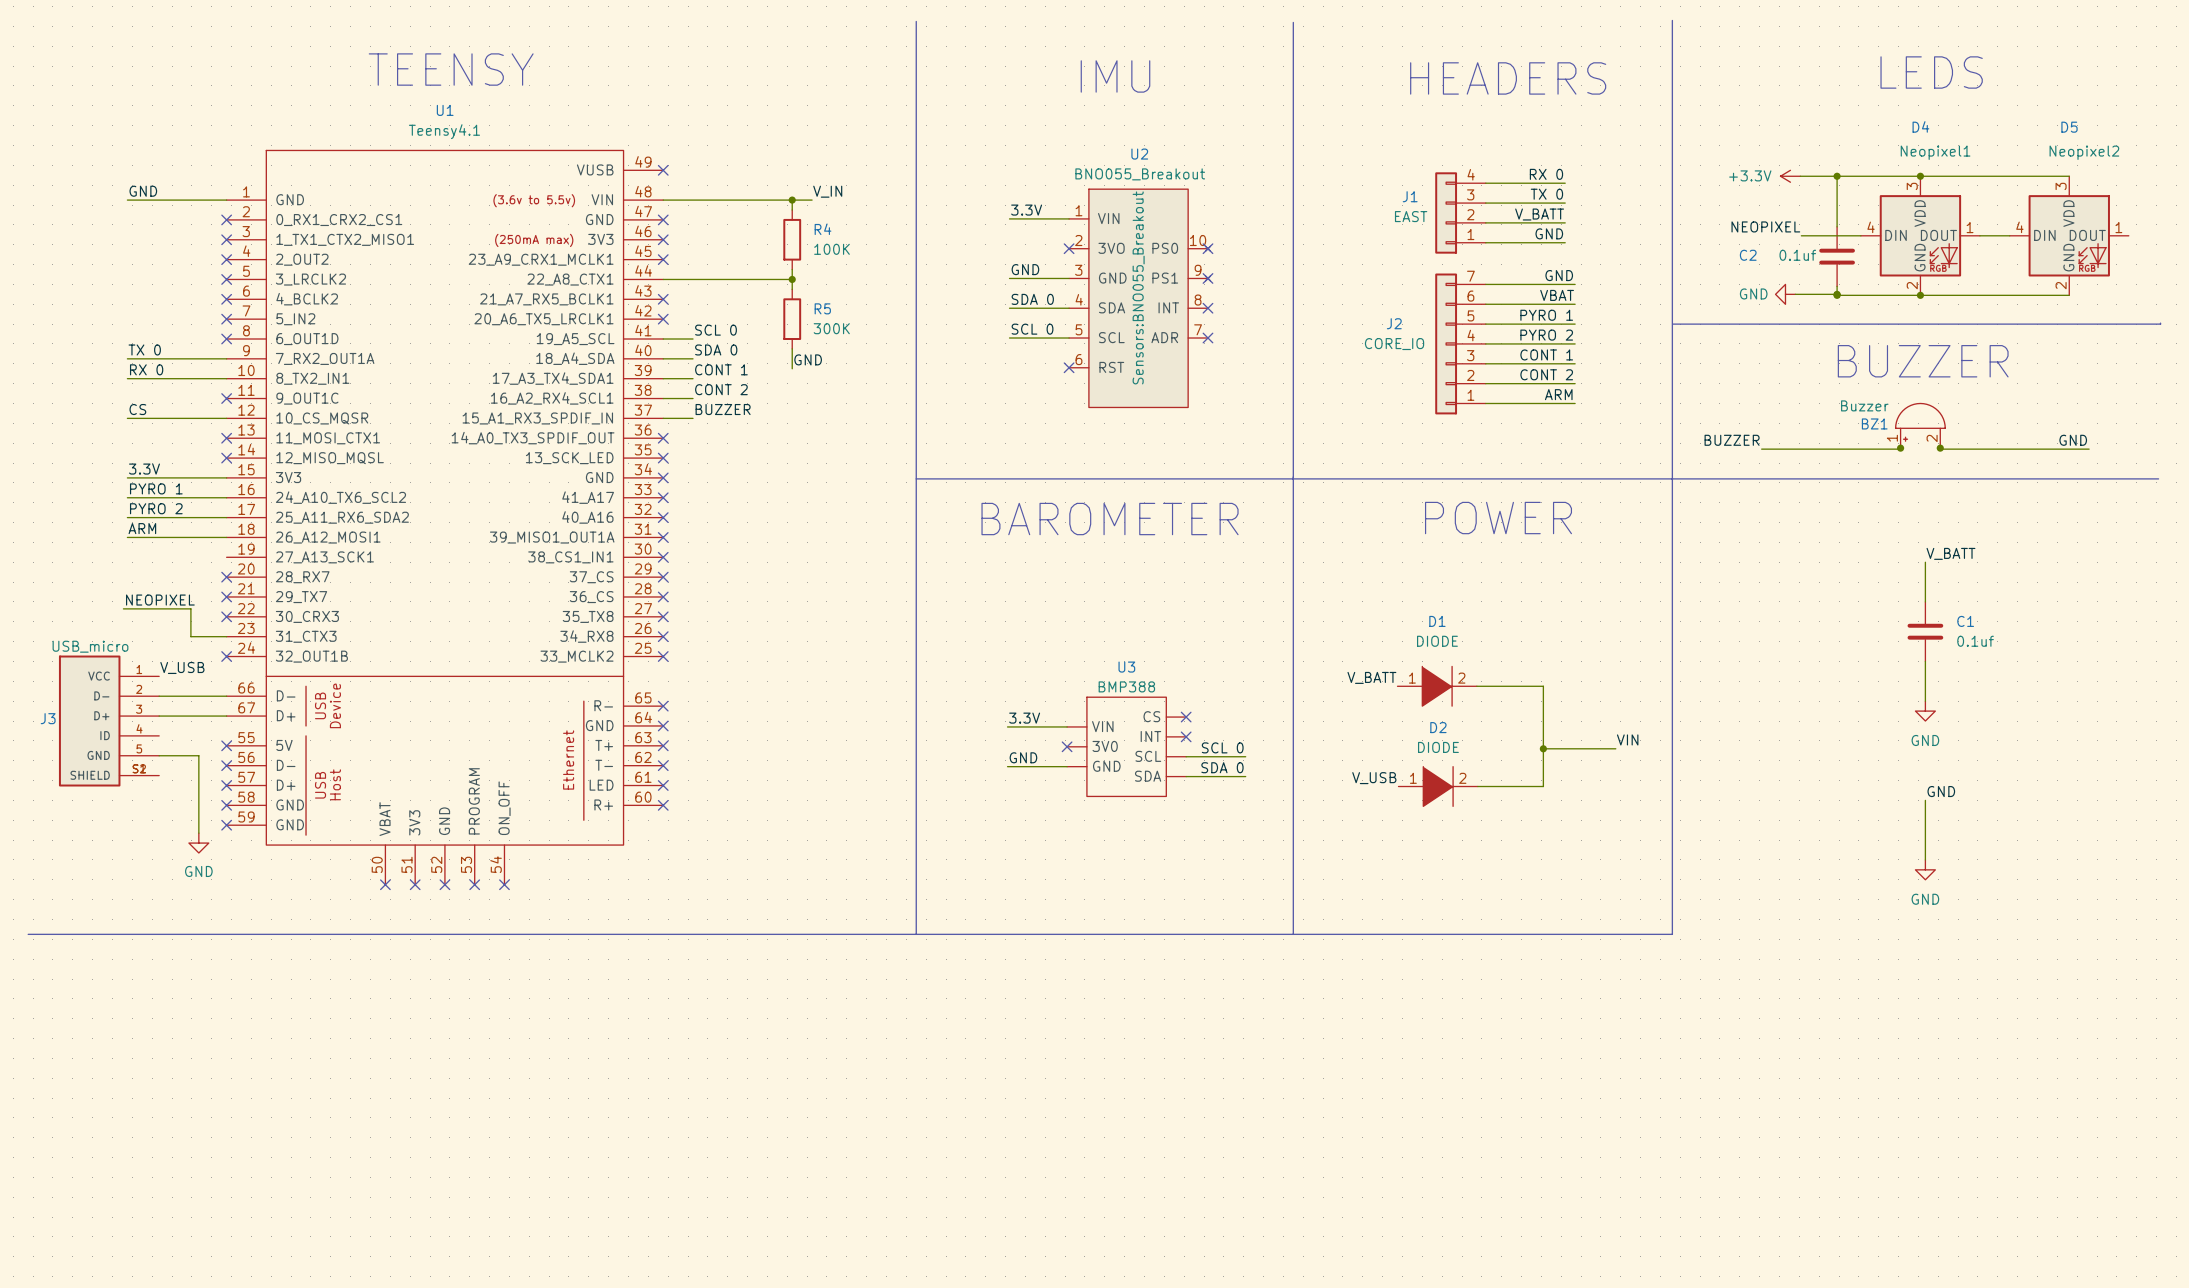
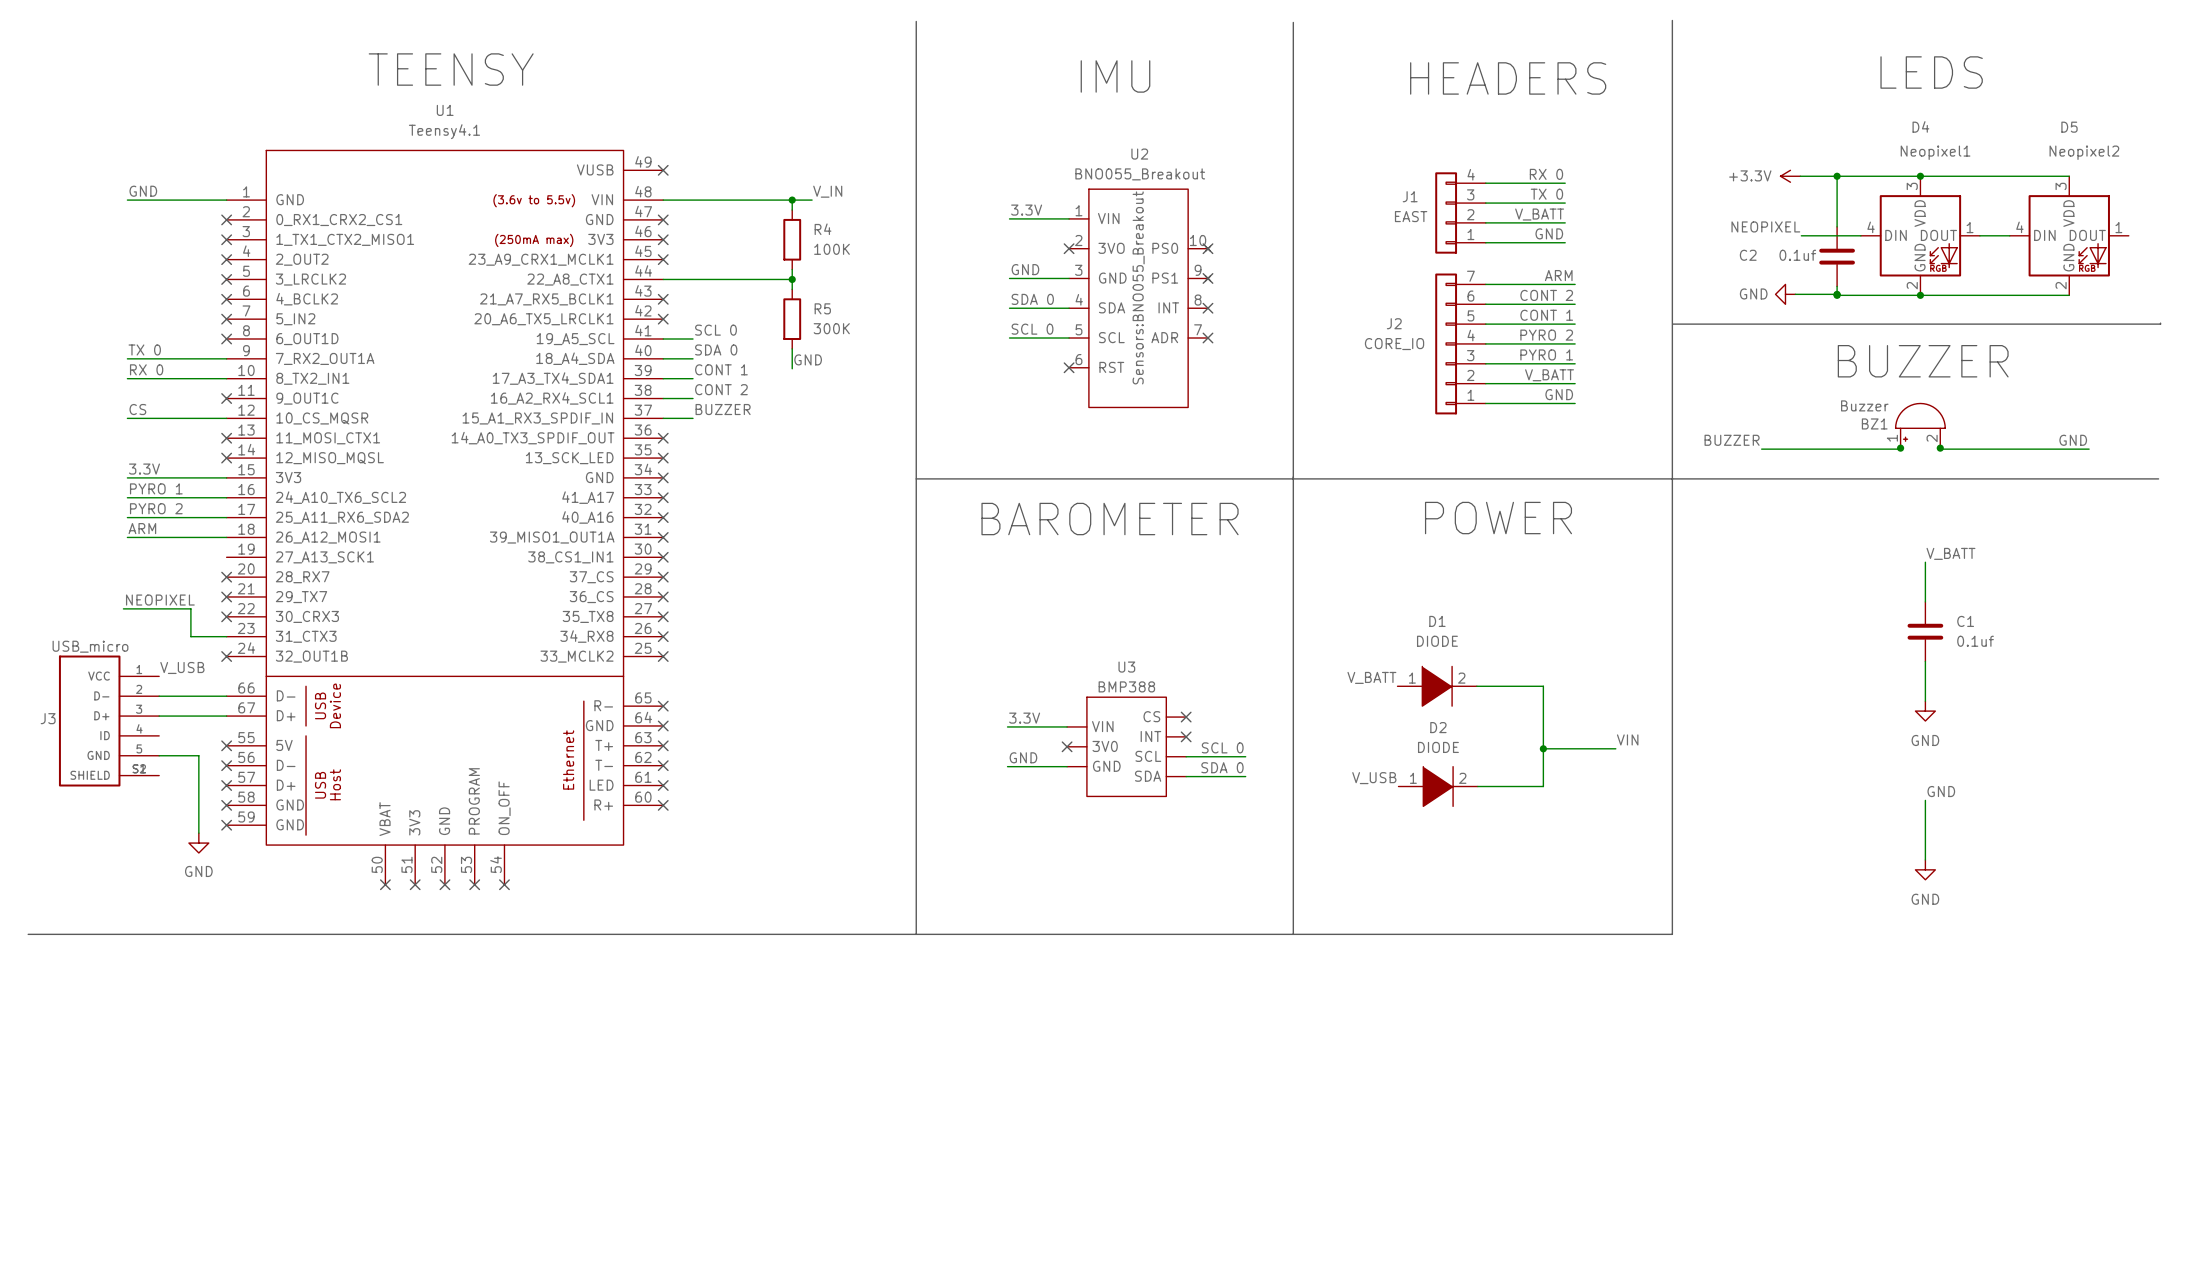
label: GND (1559, 275) -> ARM (1558, 275)
label: VBAT (1557, 295) -> CONT 2 (1546, 295)
label: PYRO 1 (1546, 315) -> CONT 1 (1546, 315)
label: CONT 1 (1546, 354) -> PYRO 1 (1546, 354)
label: CONT 2 (1546, 374) -> V_BATT (1549, 375)
label: ARM (1558, 394) -> GND (1559, 394)

